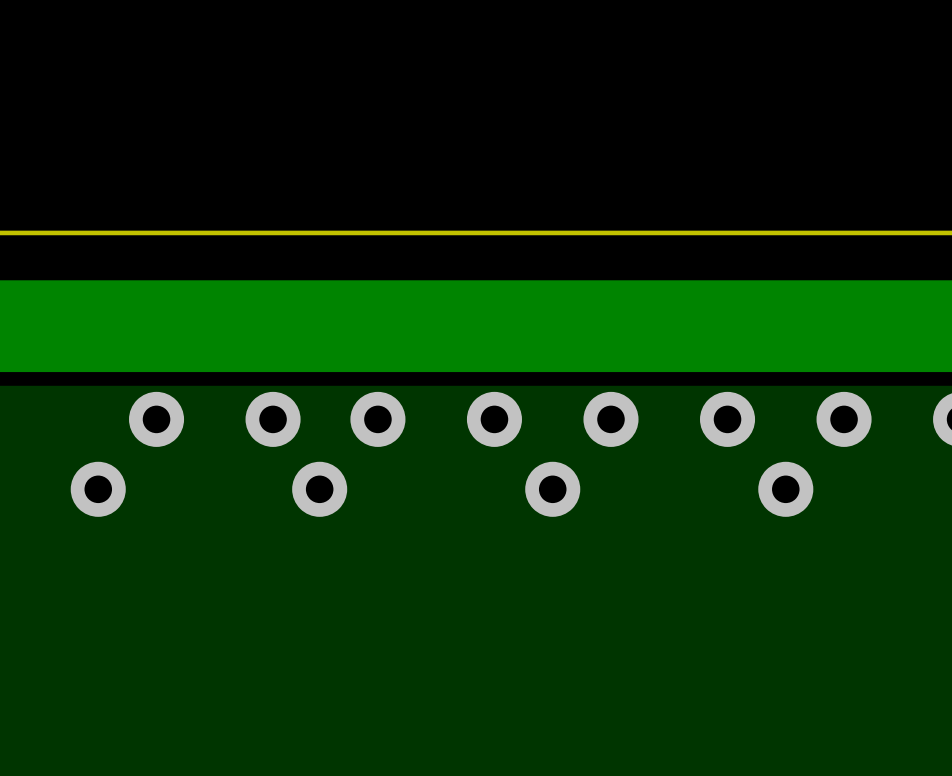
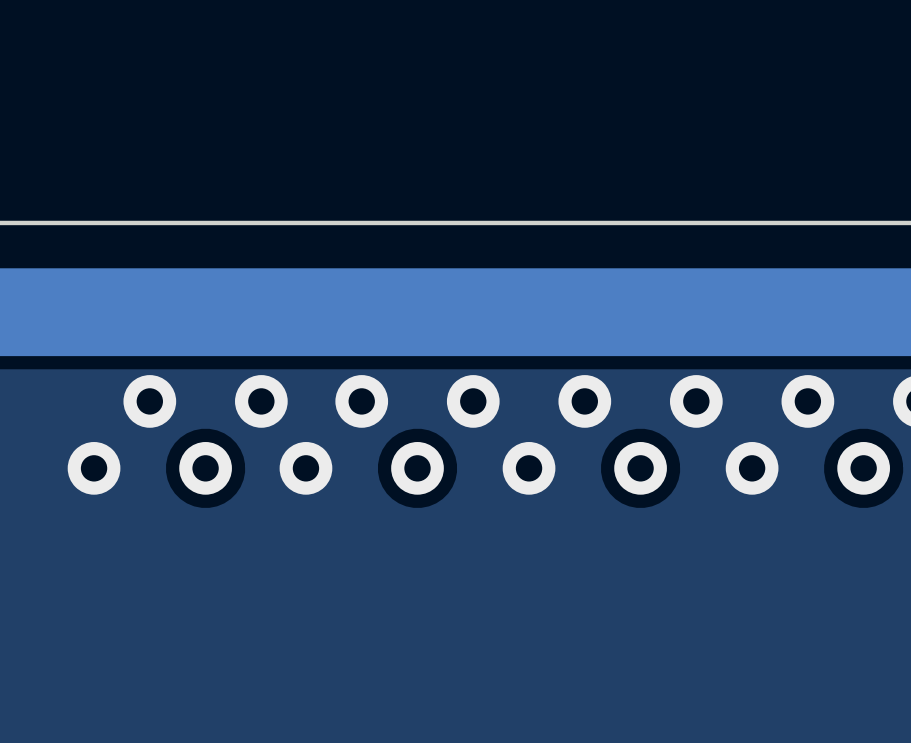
via: none -> (205, 468)
via: none -> (417, 468)
via: none -> (640, 468)
via: none -> (863, 468)

